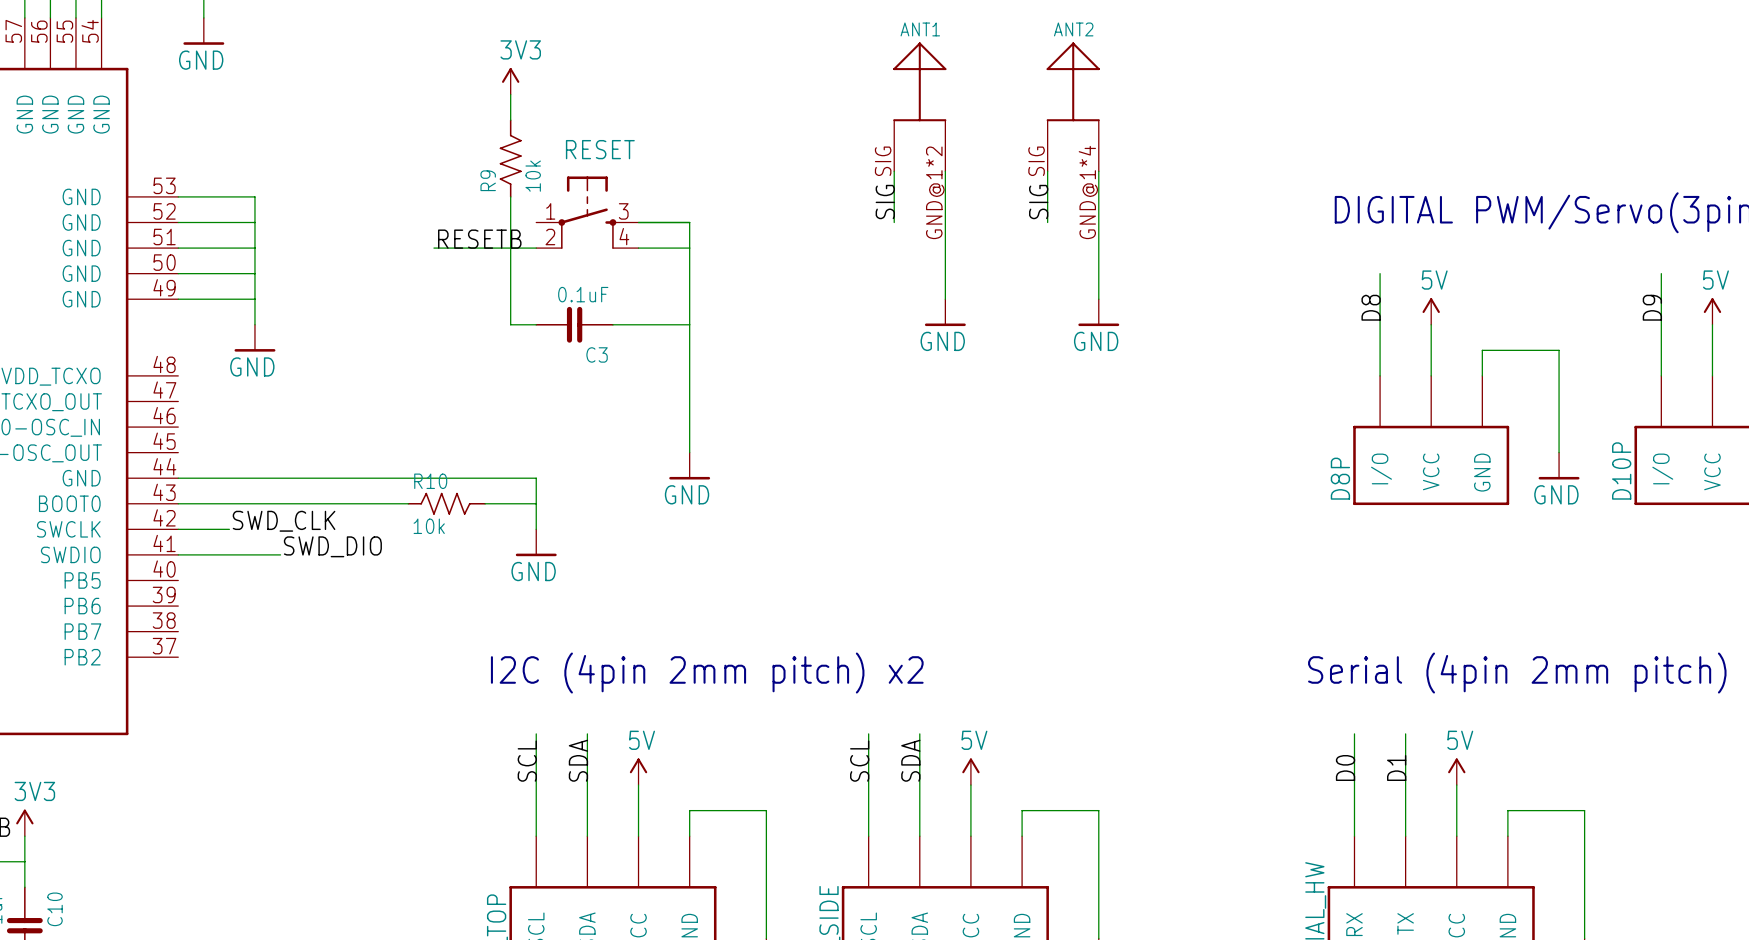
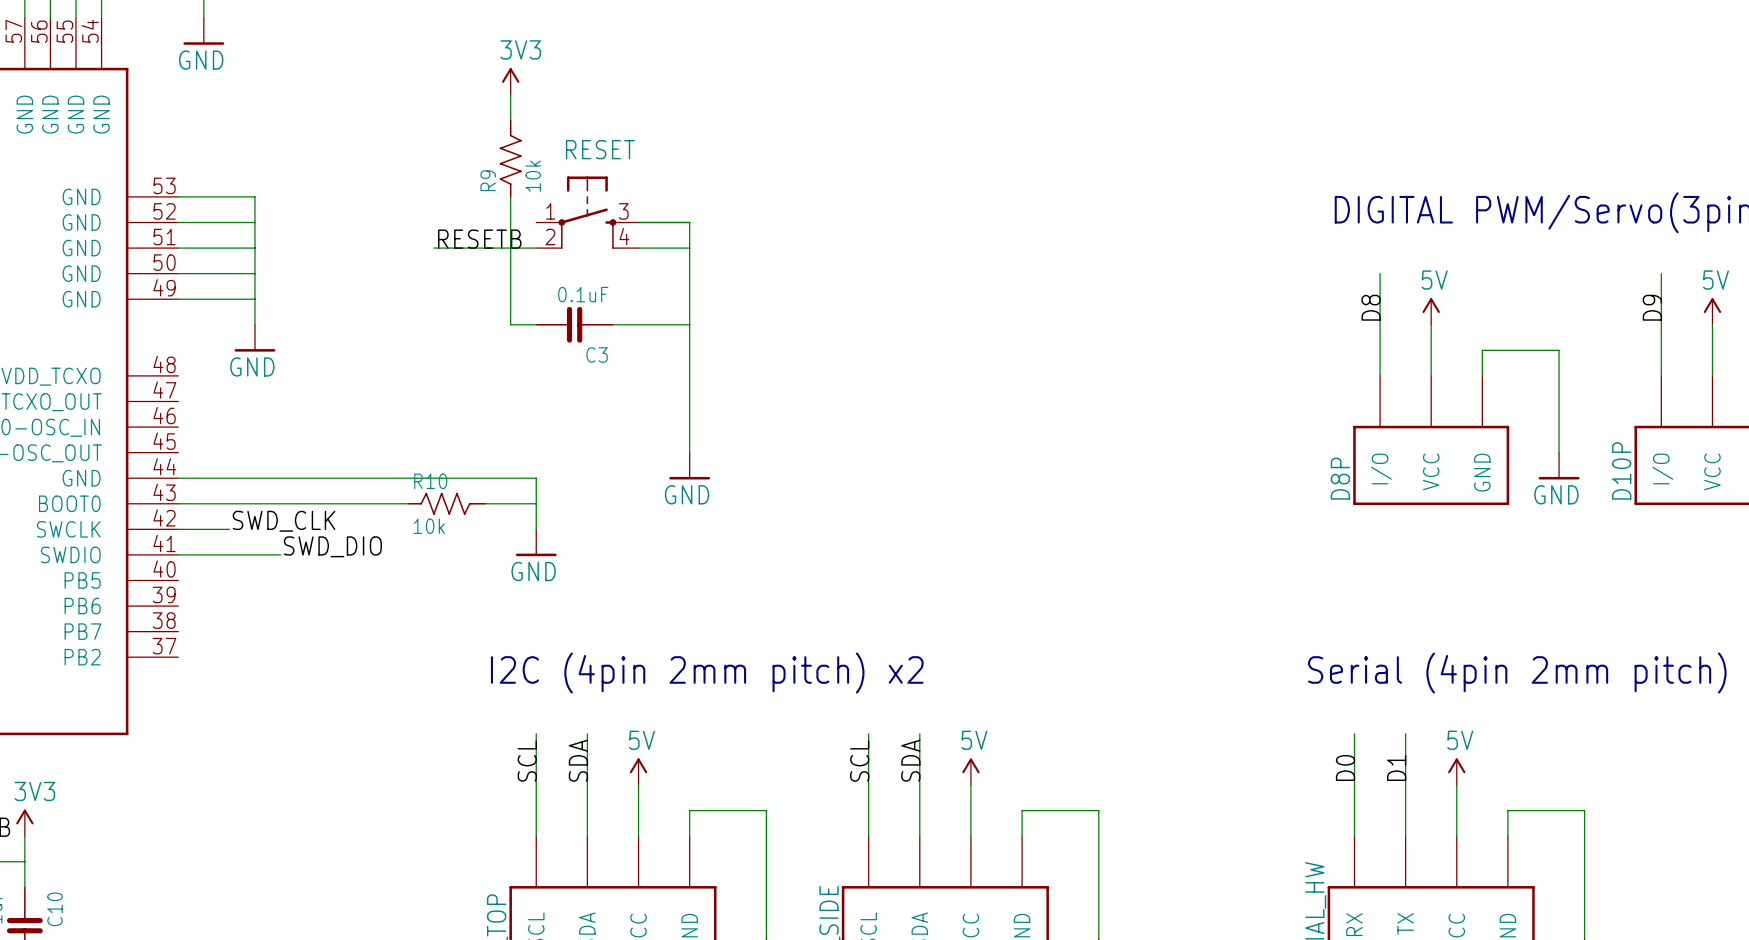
ANT1: (919, 106) -> none
ANT2: (1073, 106) -> none
wire: (894, 171) (894, 222) -> none
wire: (945, 171) (945, 299) -> none
wire: (1047, 171) (1047, 222) -> none
wire: (1098, 171) (1098, 299) -> none
label: SIG (885, 202) -> none
label: SIG (1038, 202) -> none
power symbol: GND (945, 312) -> none
power symbol: GND (1098, 312) -> none

